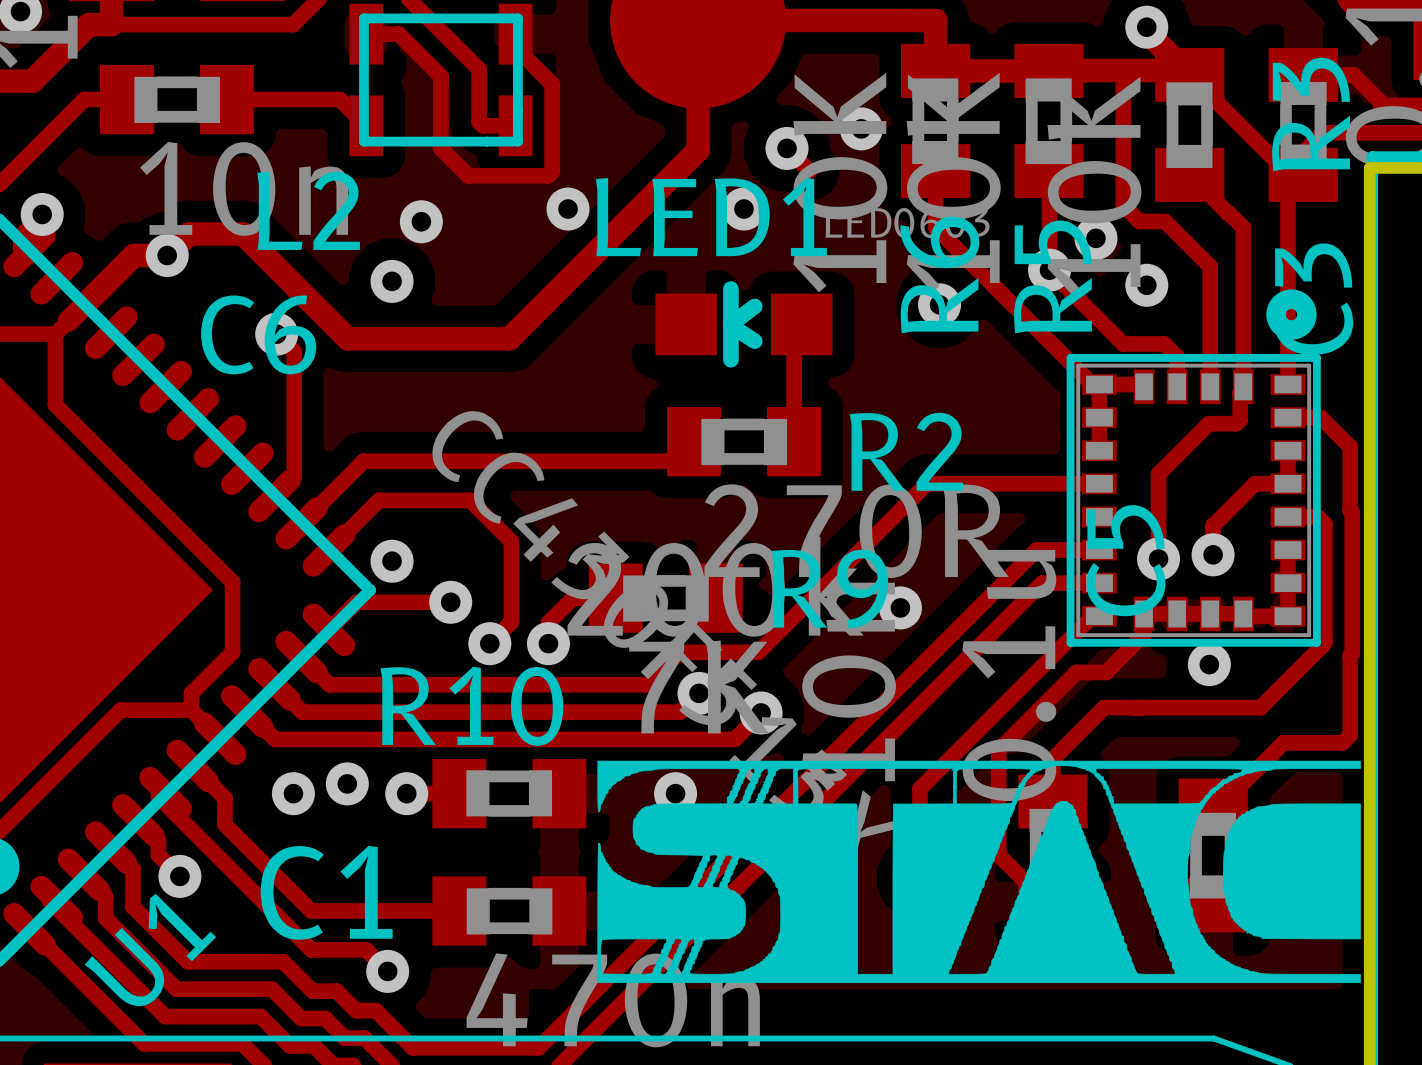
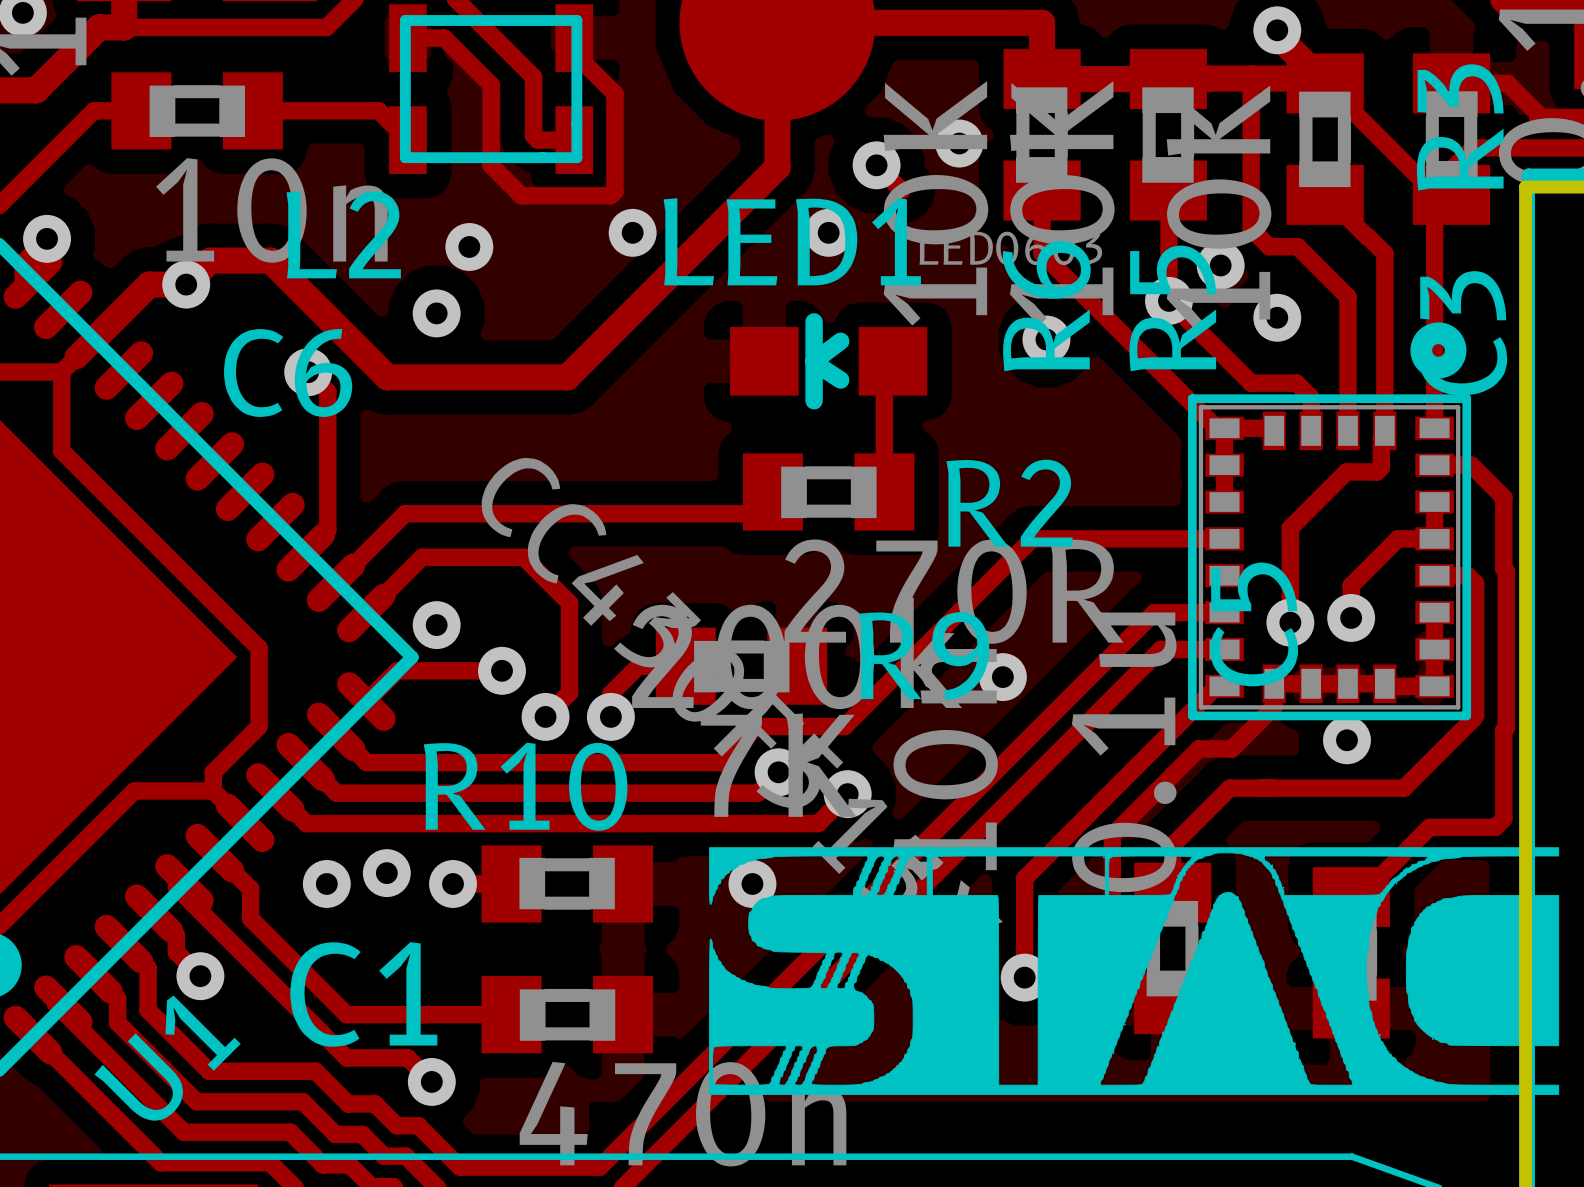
drawing position: (979, 871) -> (1134, 971)

